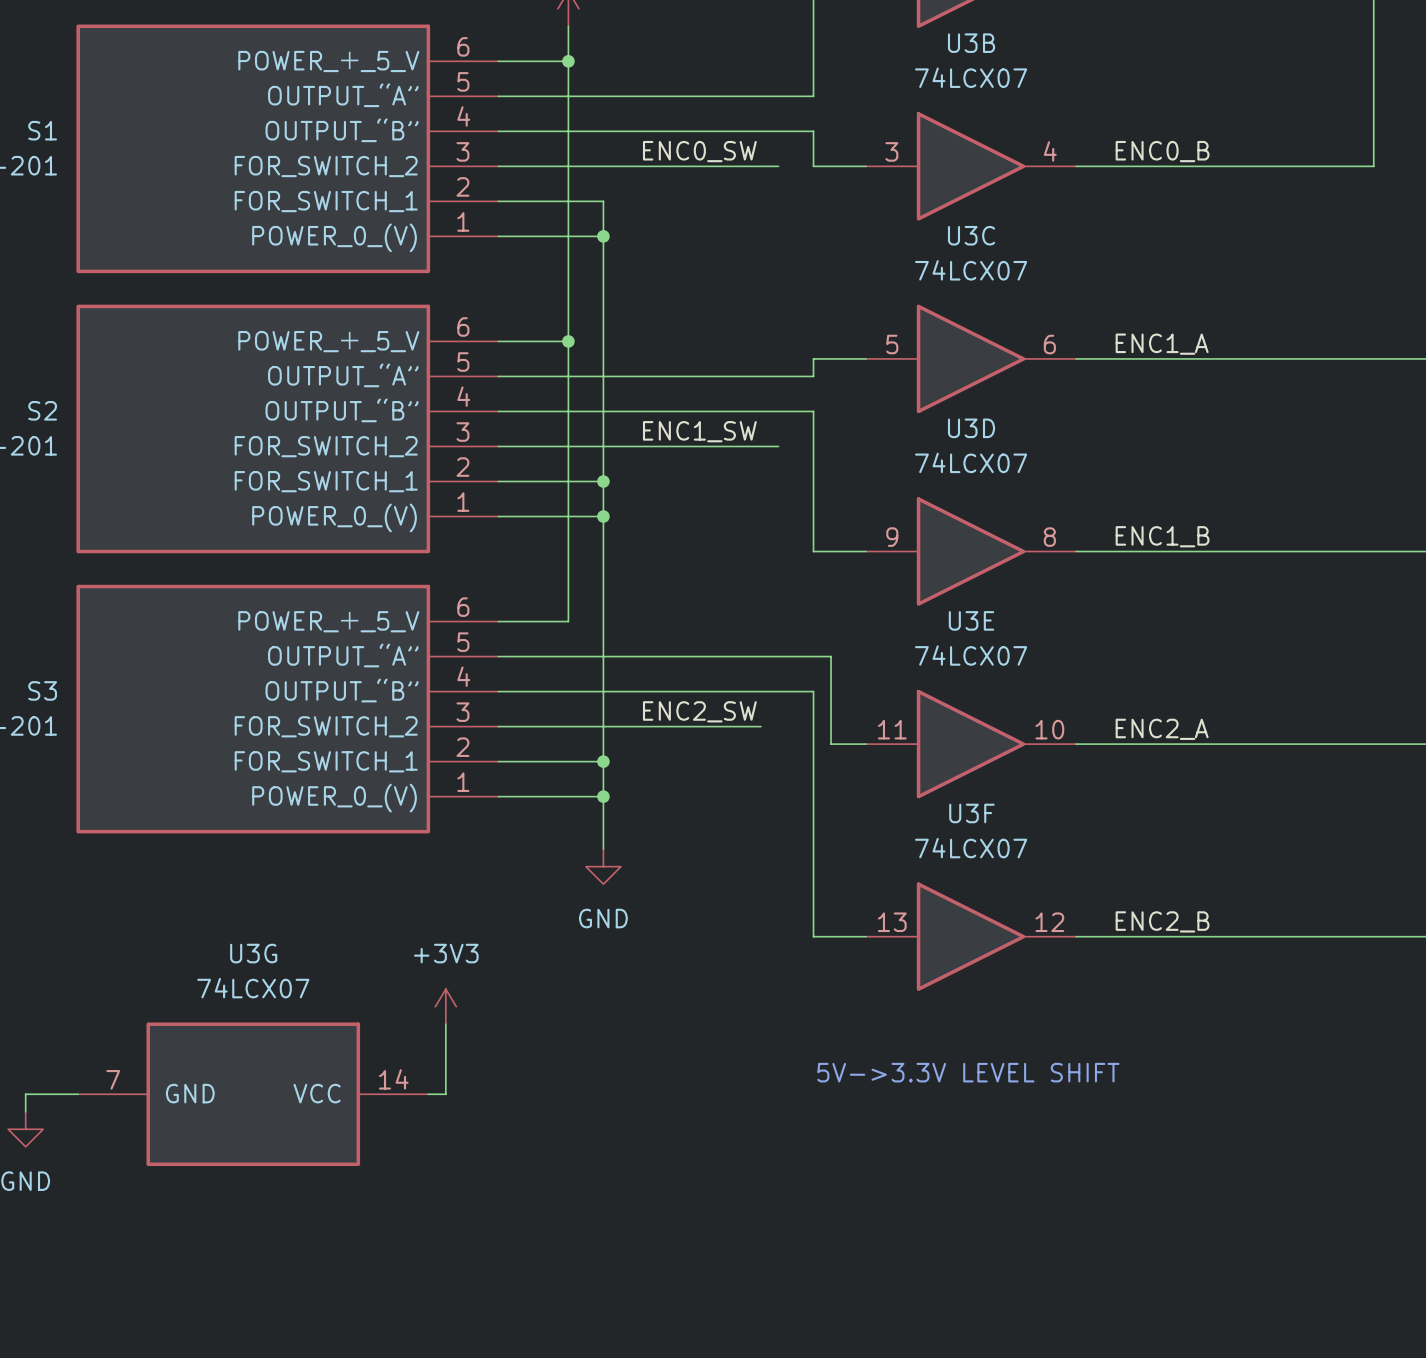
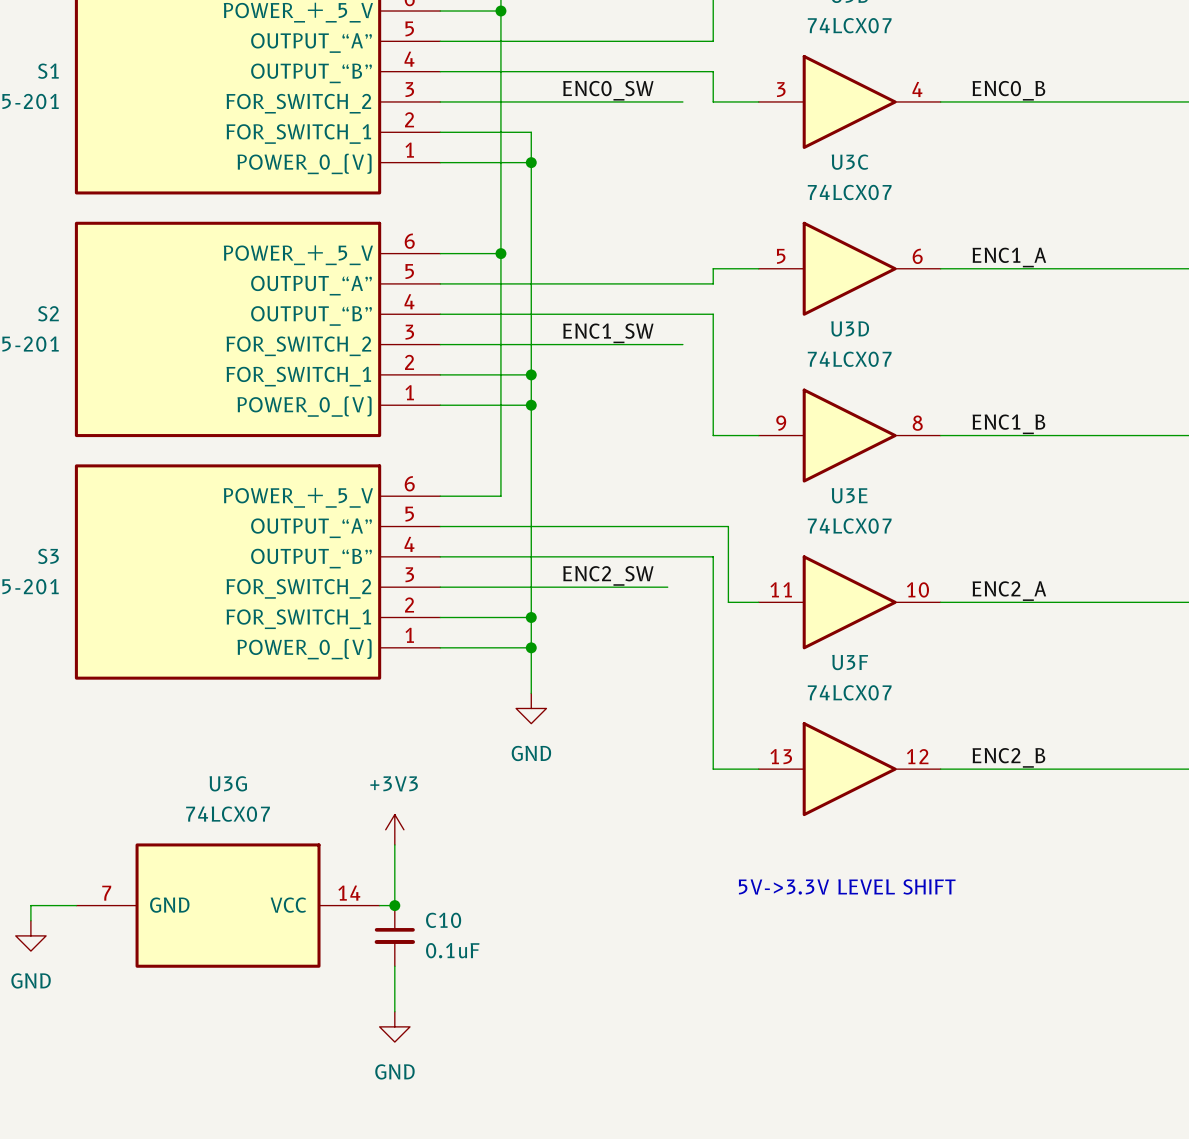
junction: none -> (394, 905)
C10: none -> 0.1uF (394, 935)
wire: none -> (394, 966) (394, 1011)
power symbol: none -> GND (394, 1026)

